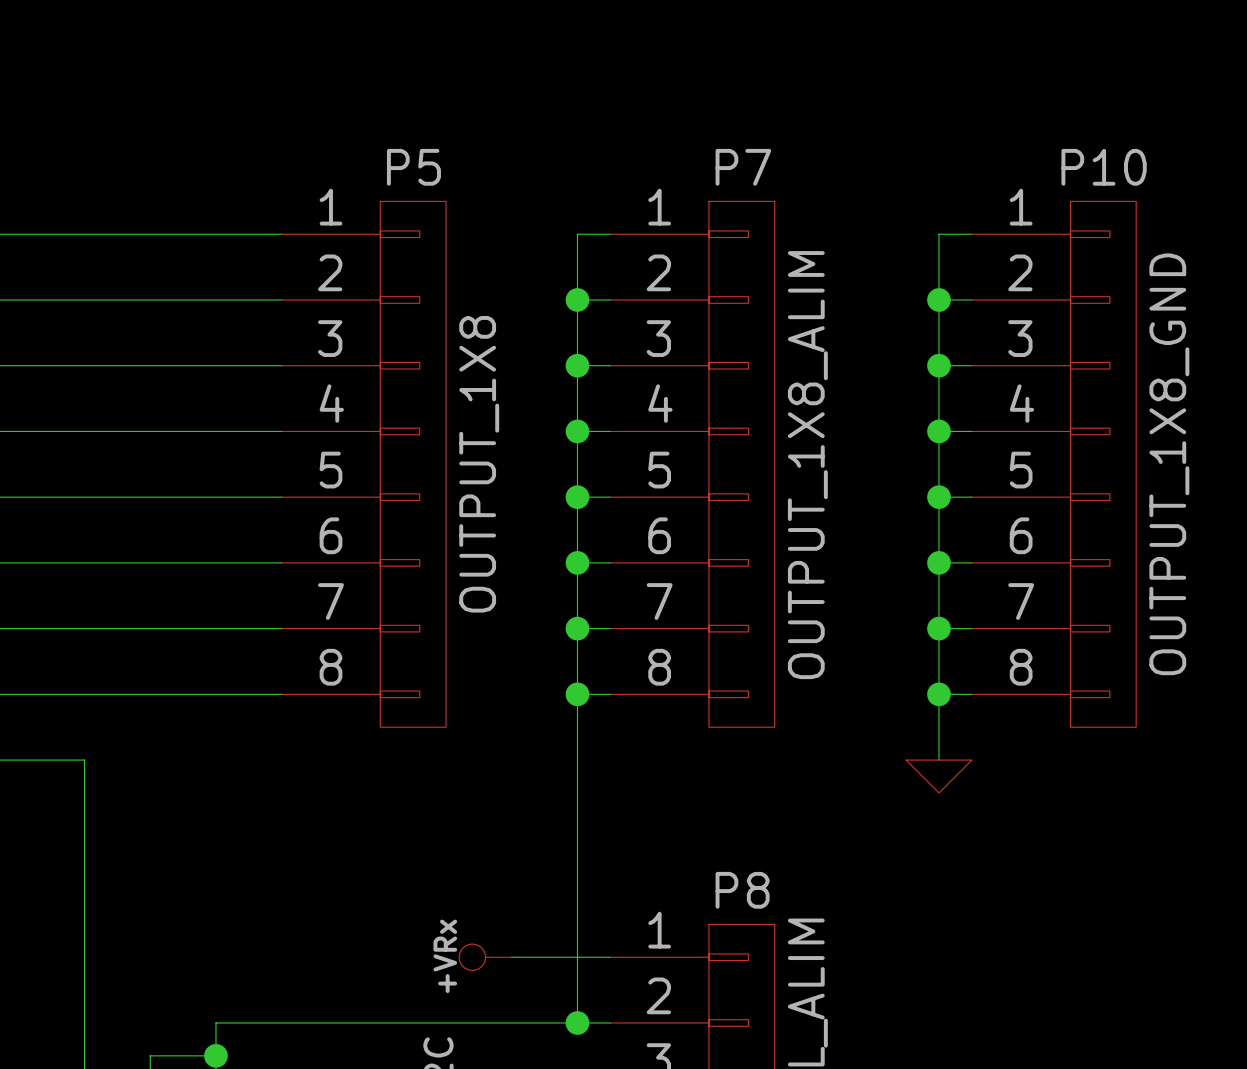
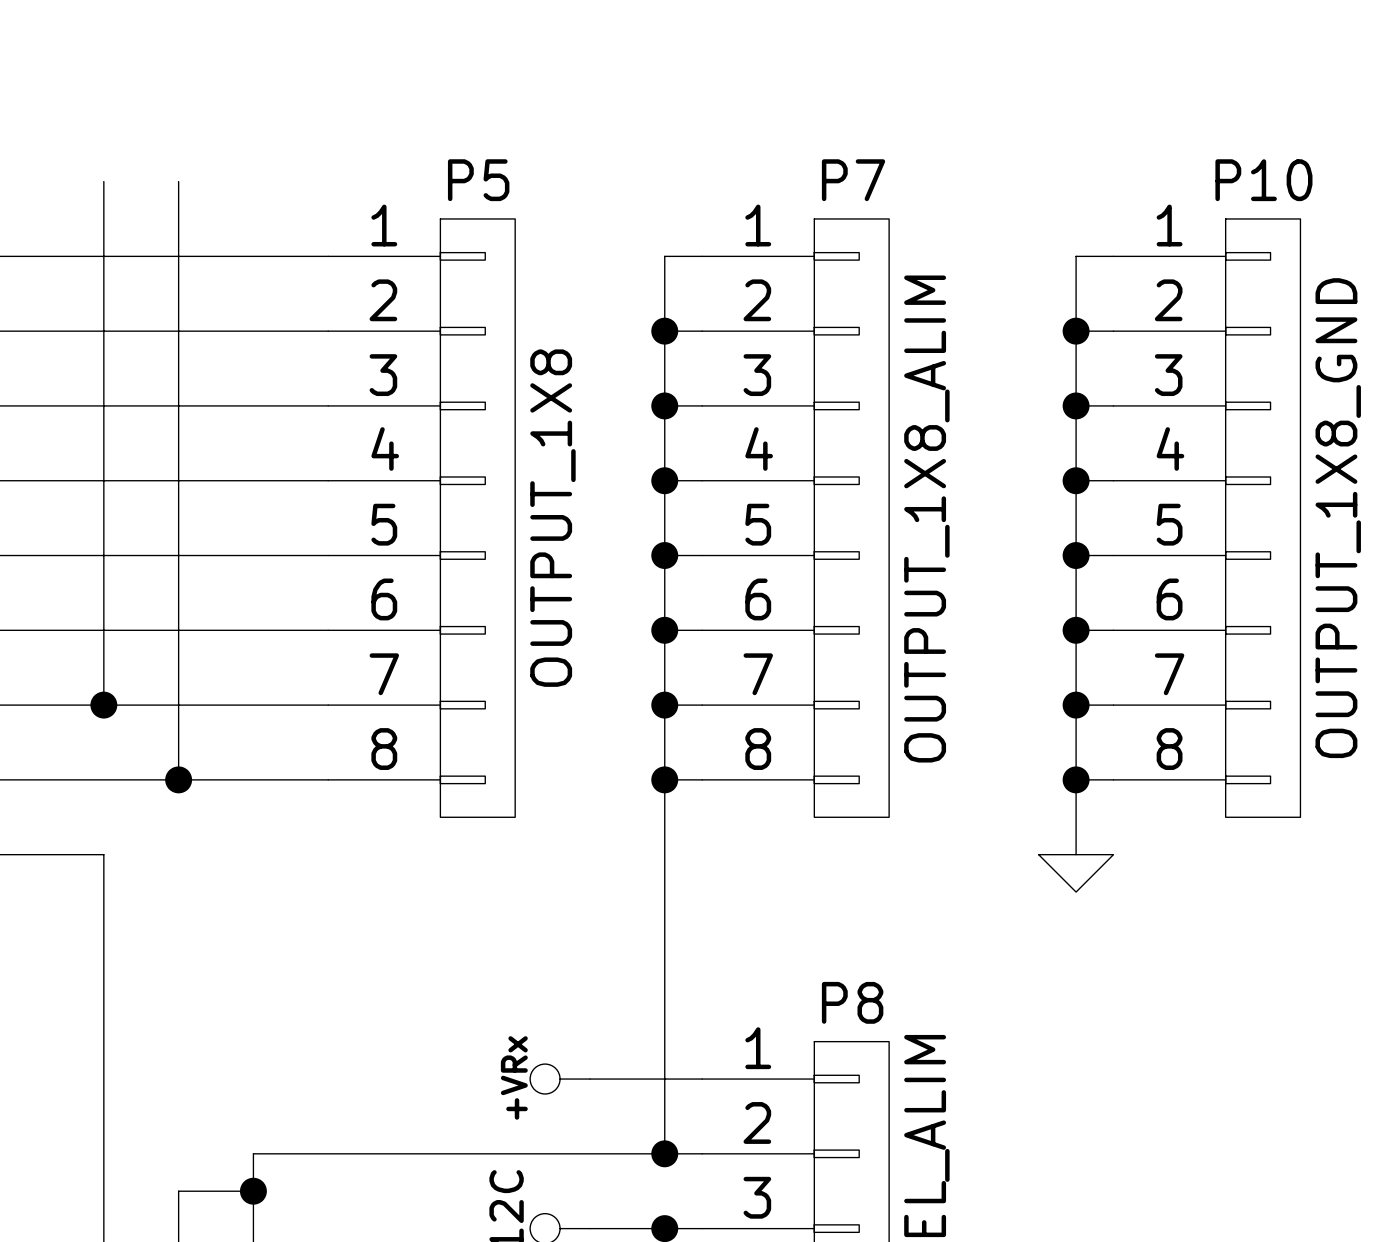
wire: none -> (103, 181) (103, 705)
wire: none -> (178, 181) (178, 779)
junction: none -> (103, 705)
junction: none -> (178, 779)

